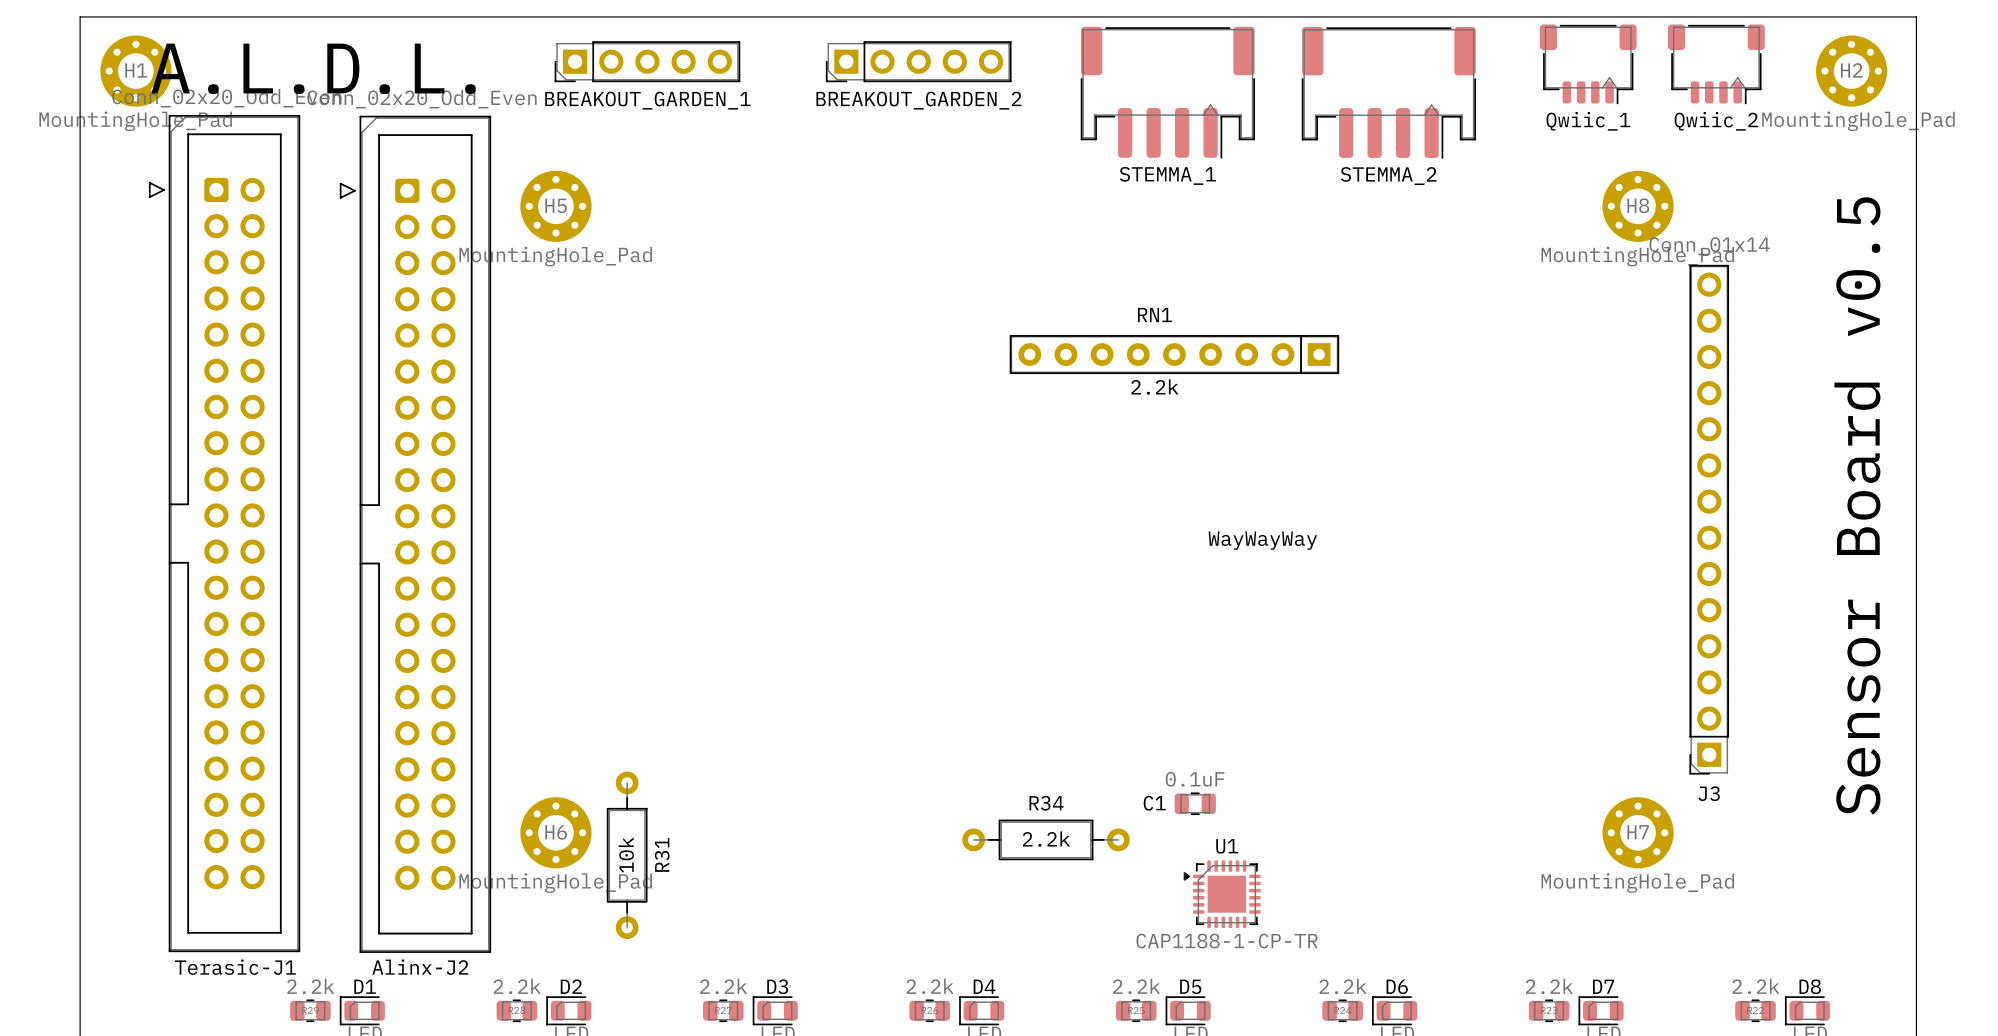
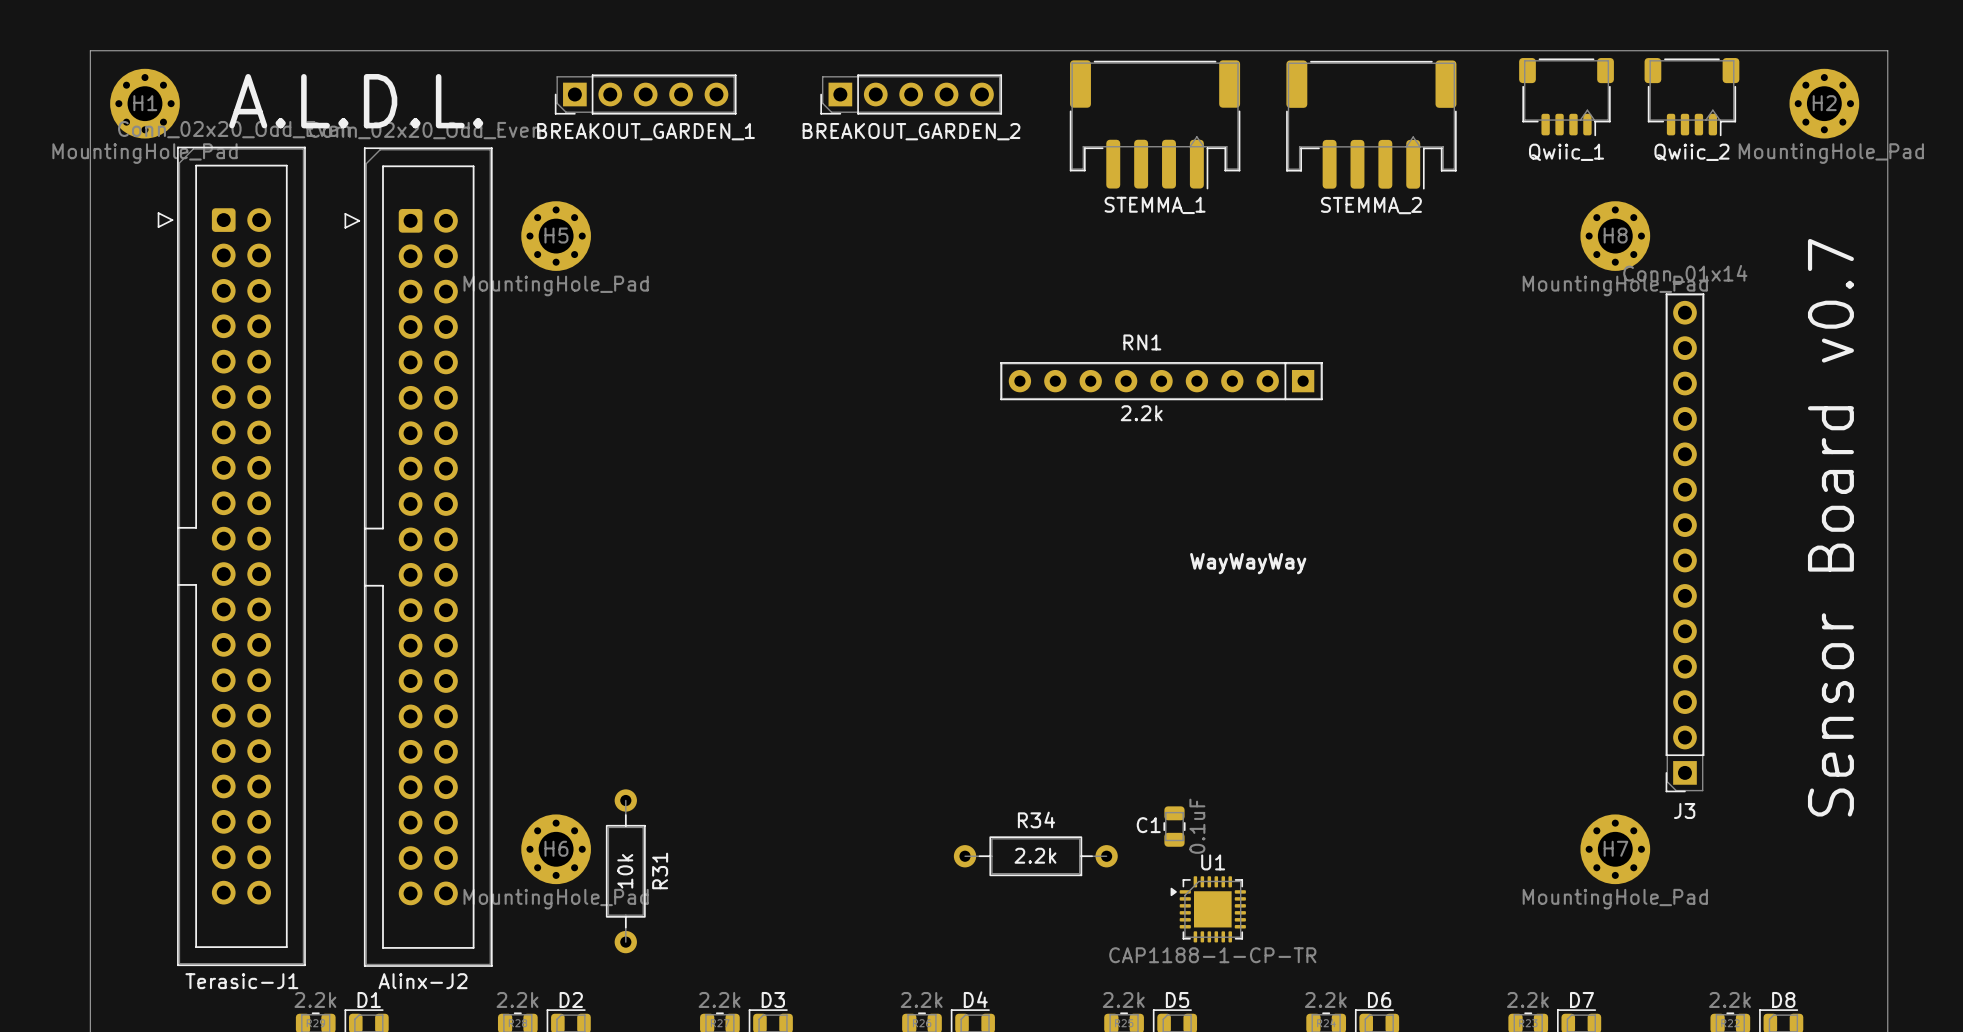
text: Sensor Board v0.5 (1857, 506) -> Sensor Board v0.7 (1830, 527)
C1 rotation: 0° (1195, 803) -> 90° clockwise (1174, 826)

